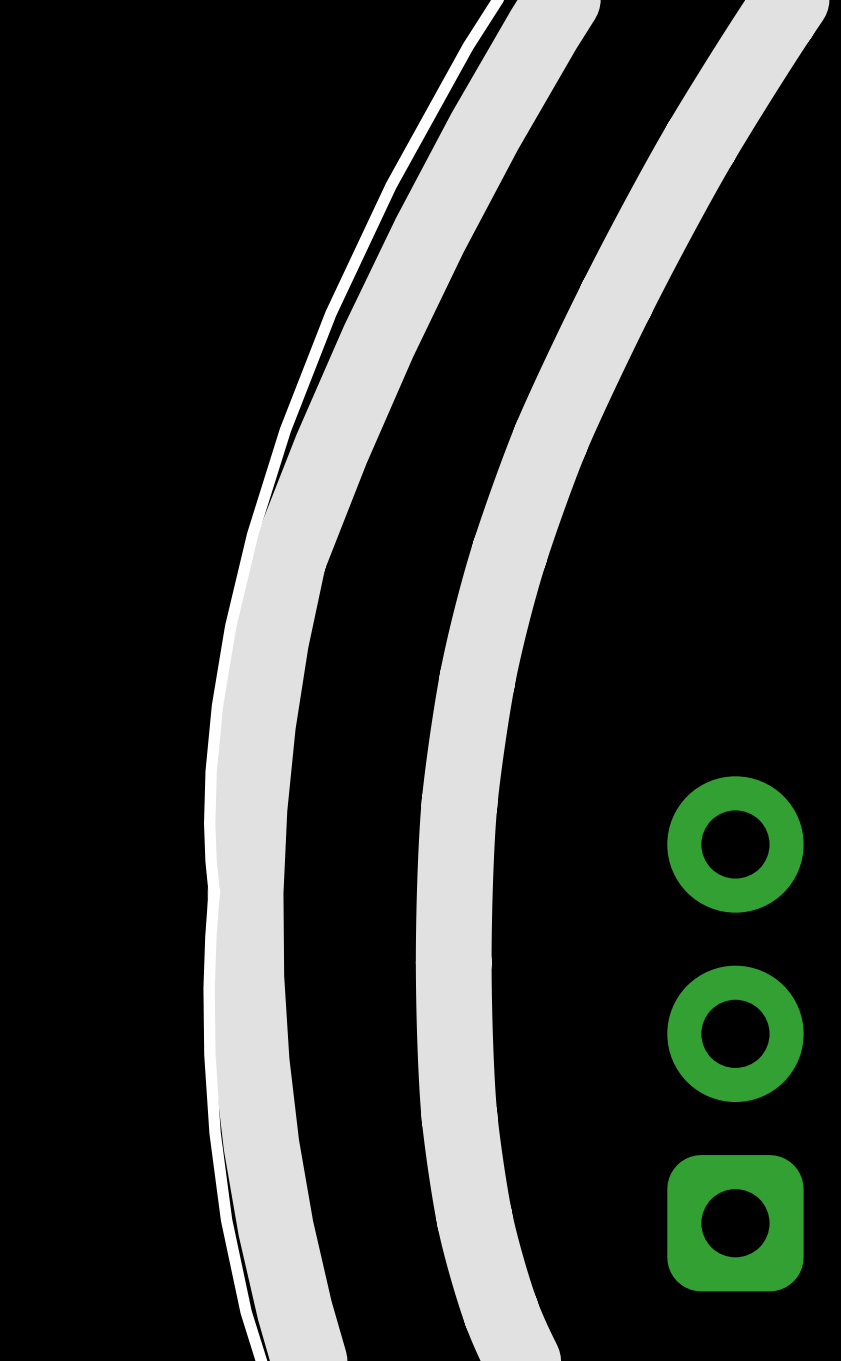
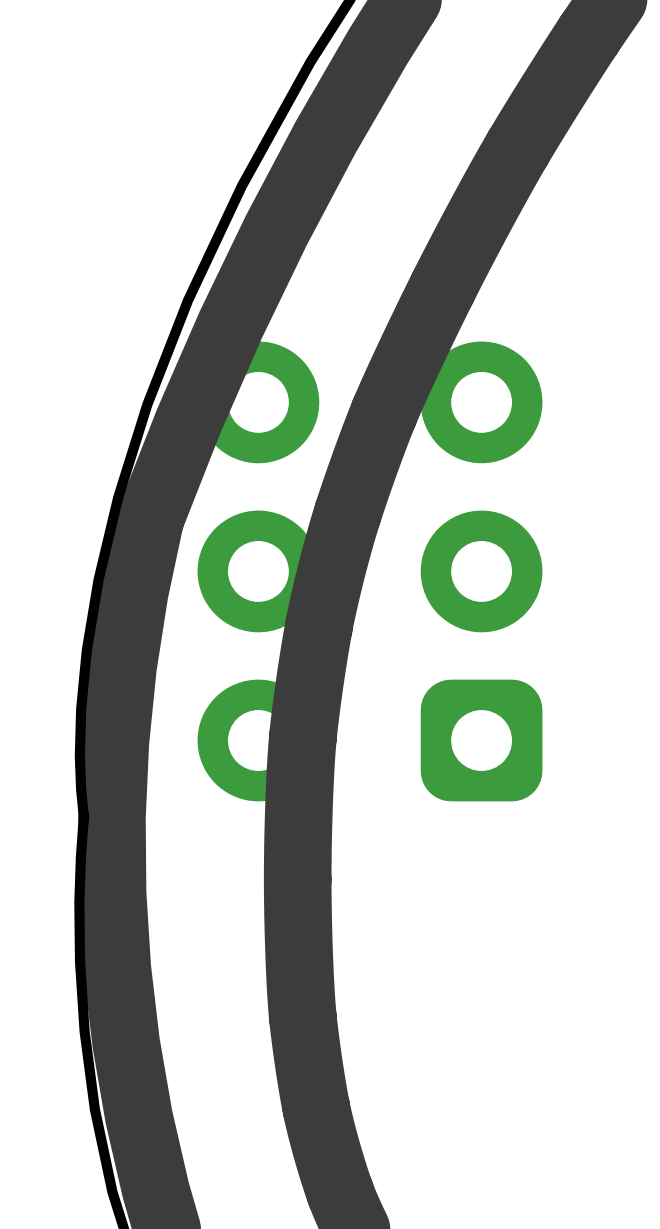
part: none -> (370, 571)
part: (735, 1033) -> none

